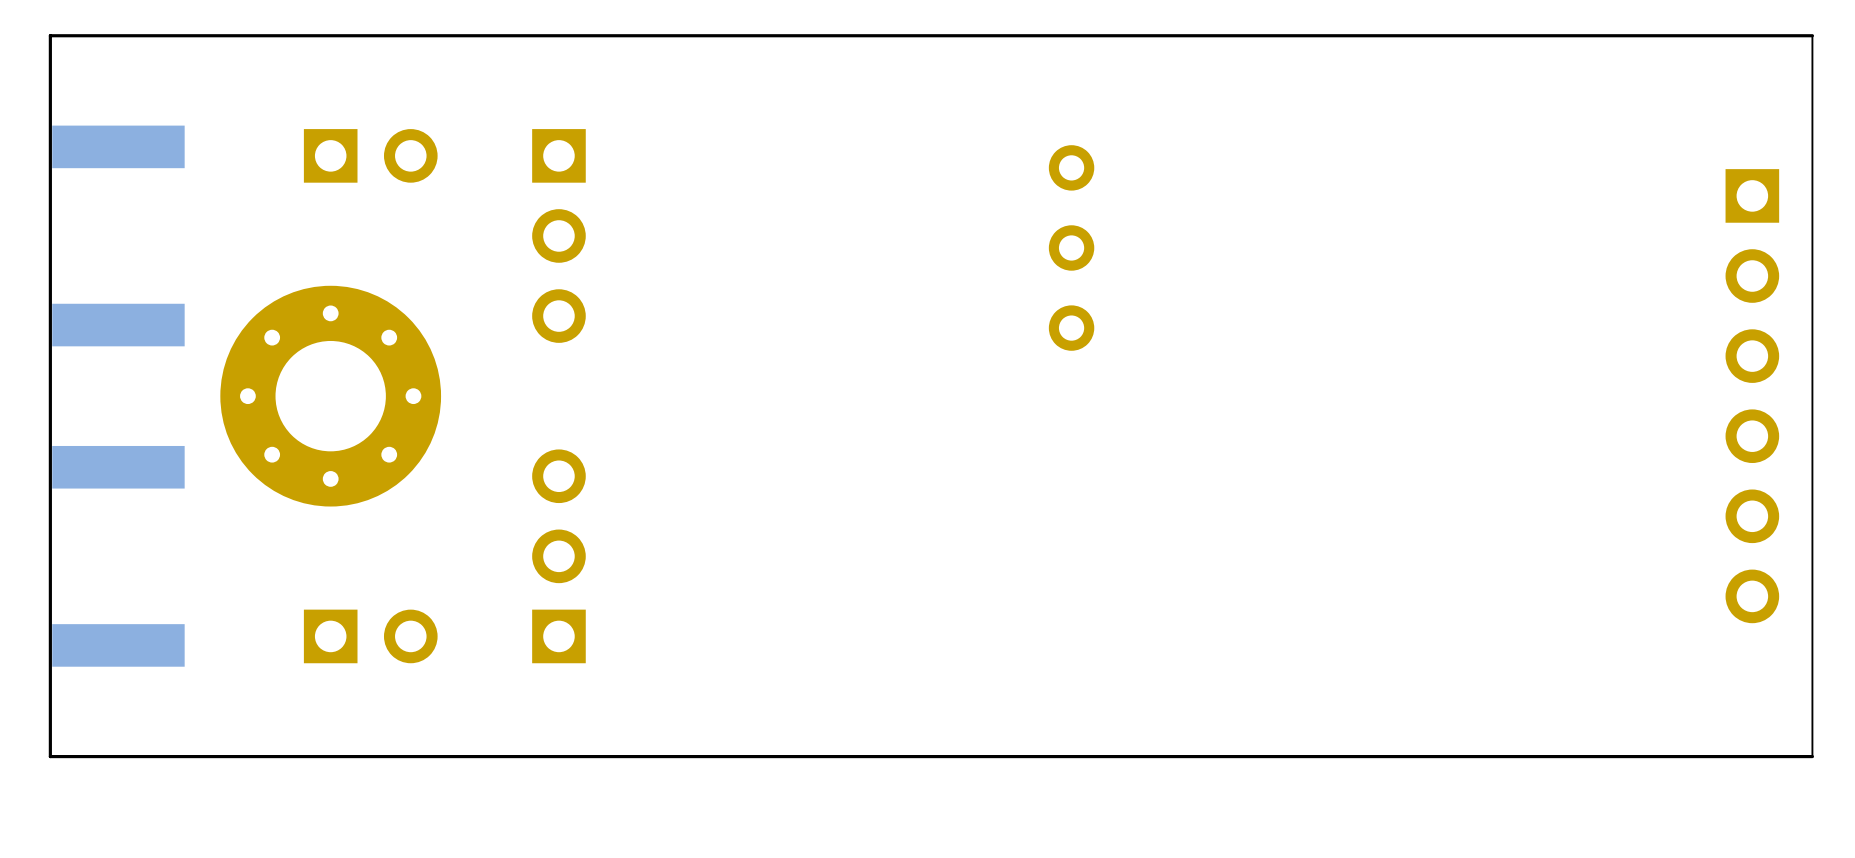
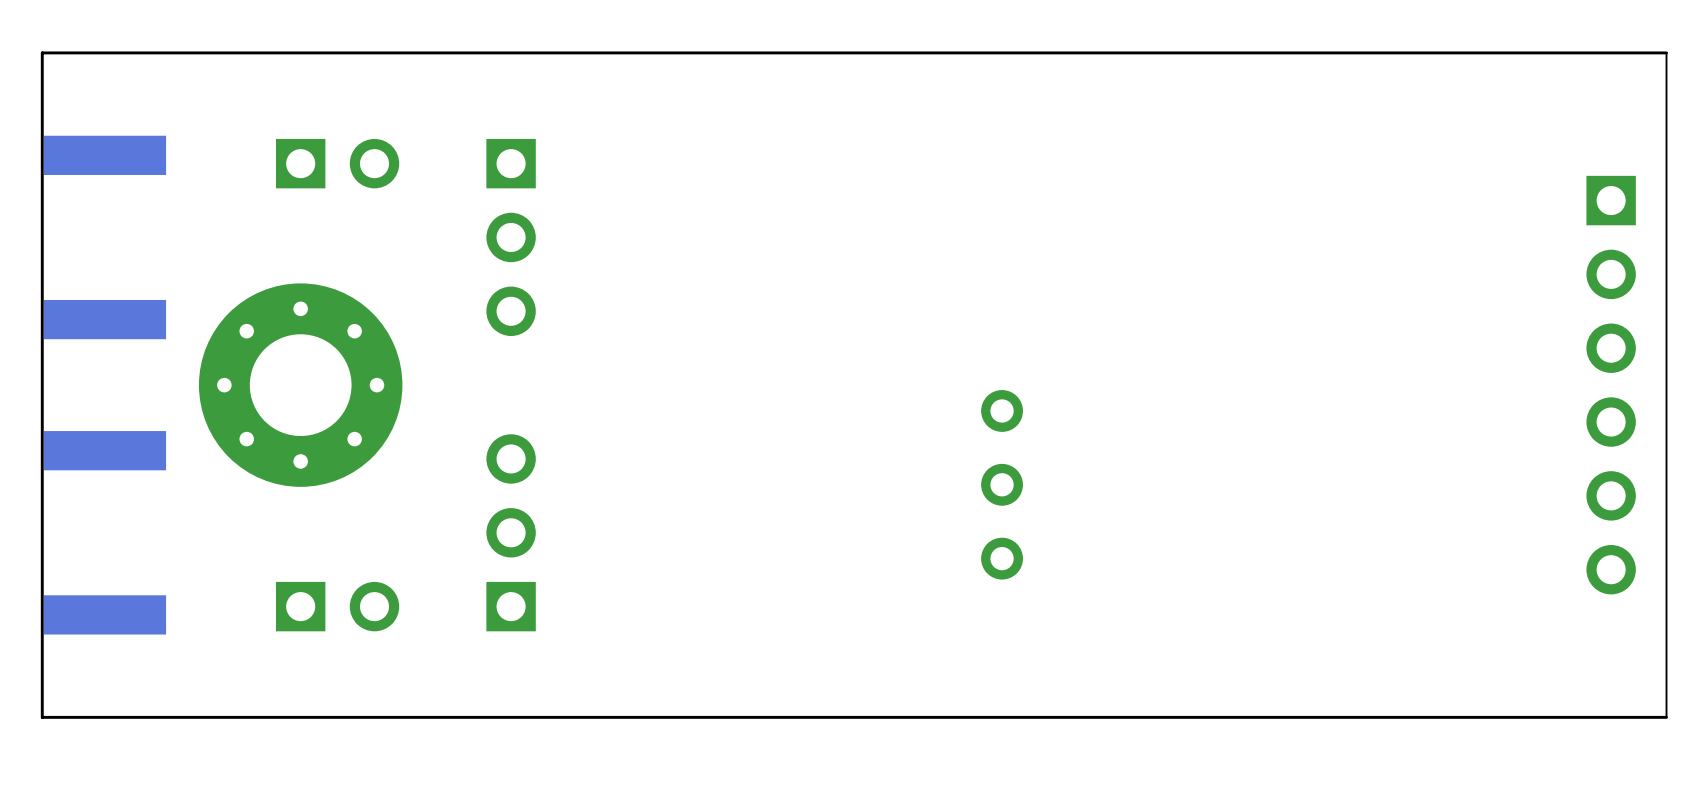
part position: (1071, 247) -> (1002, 484)

